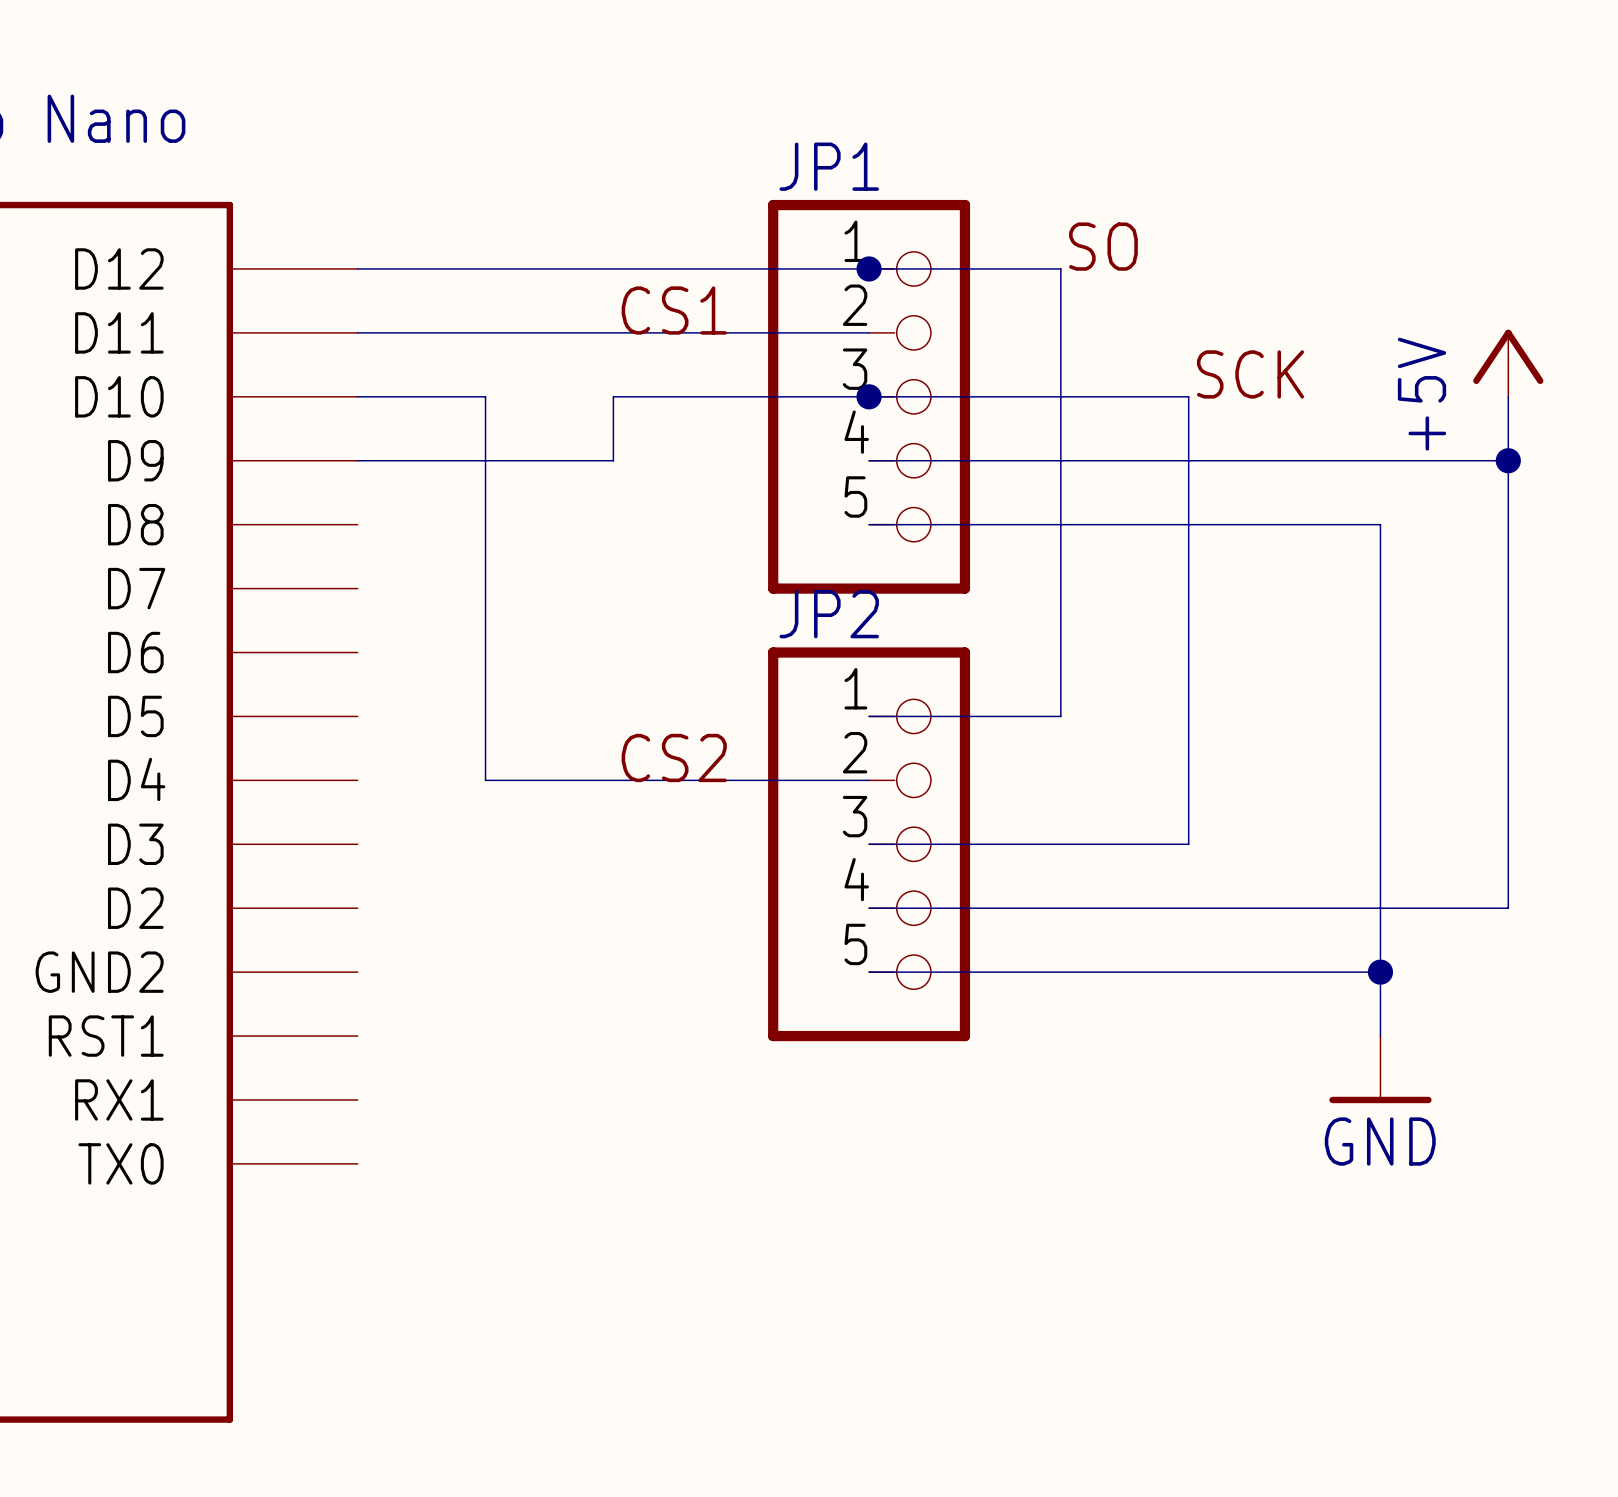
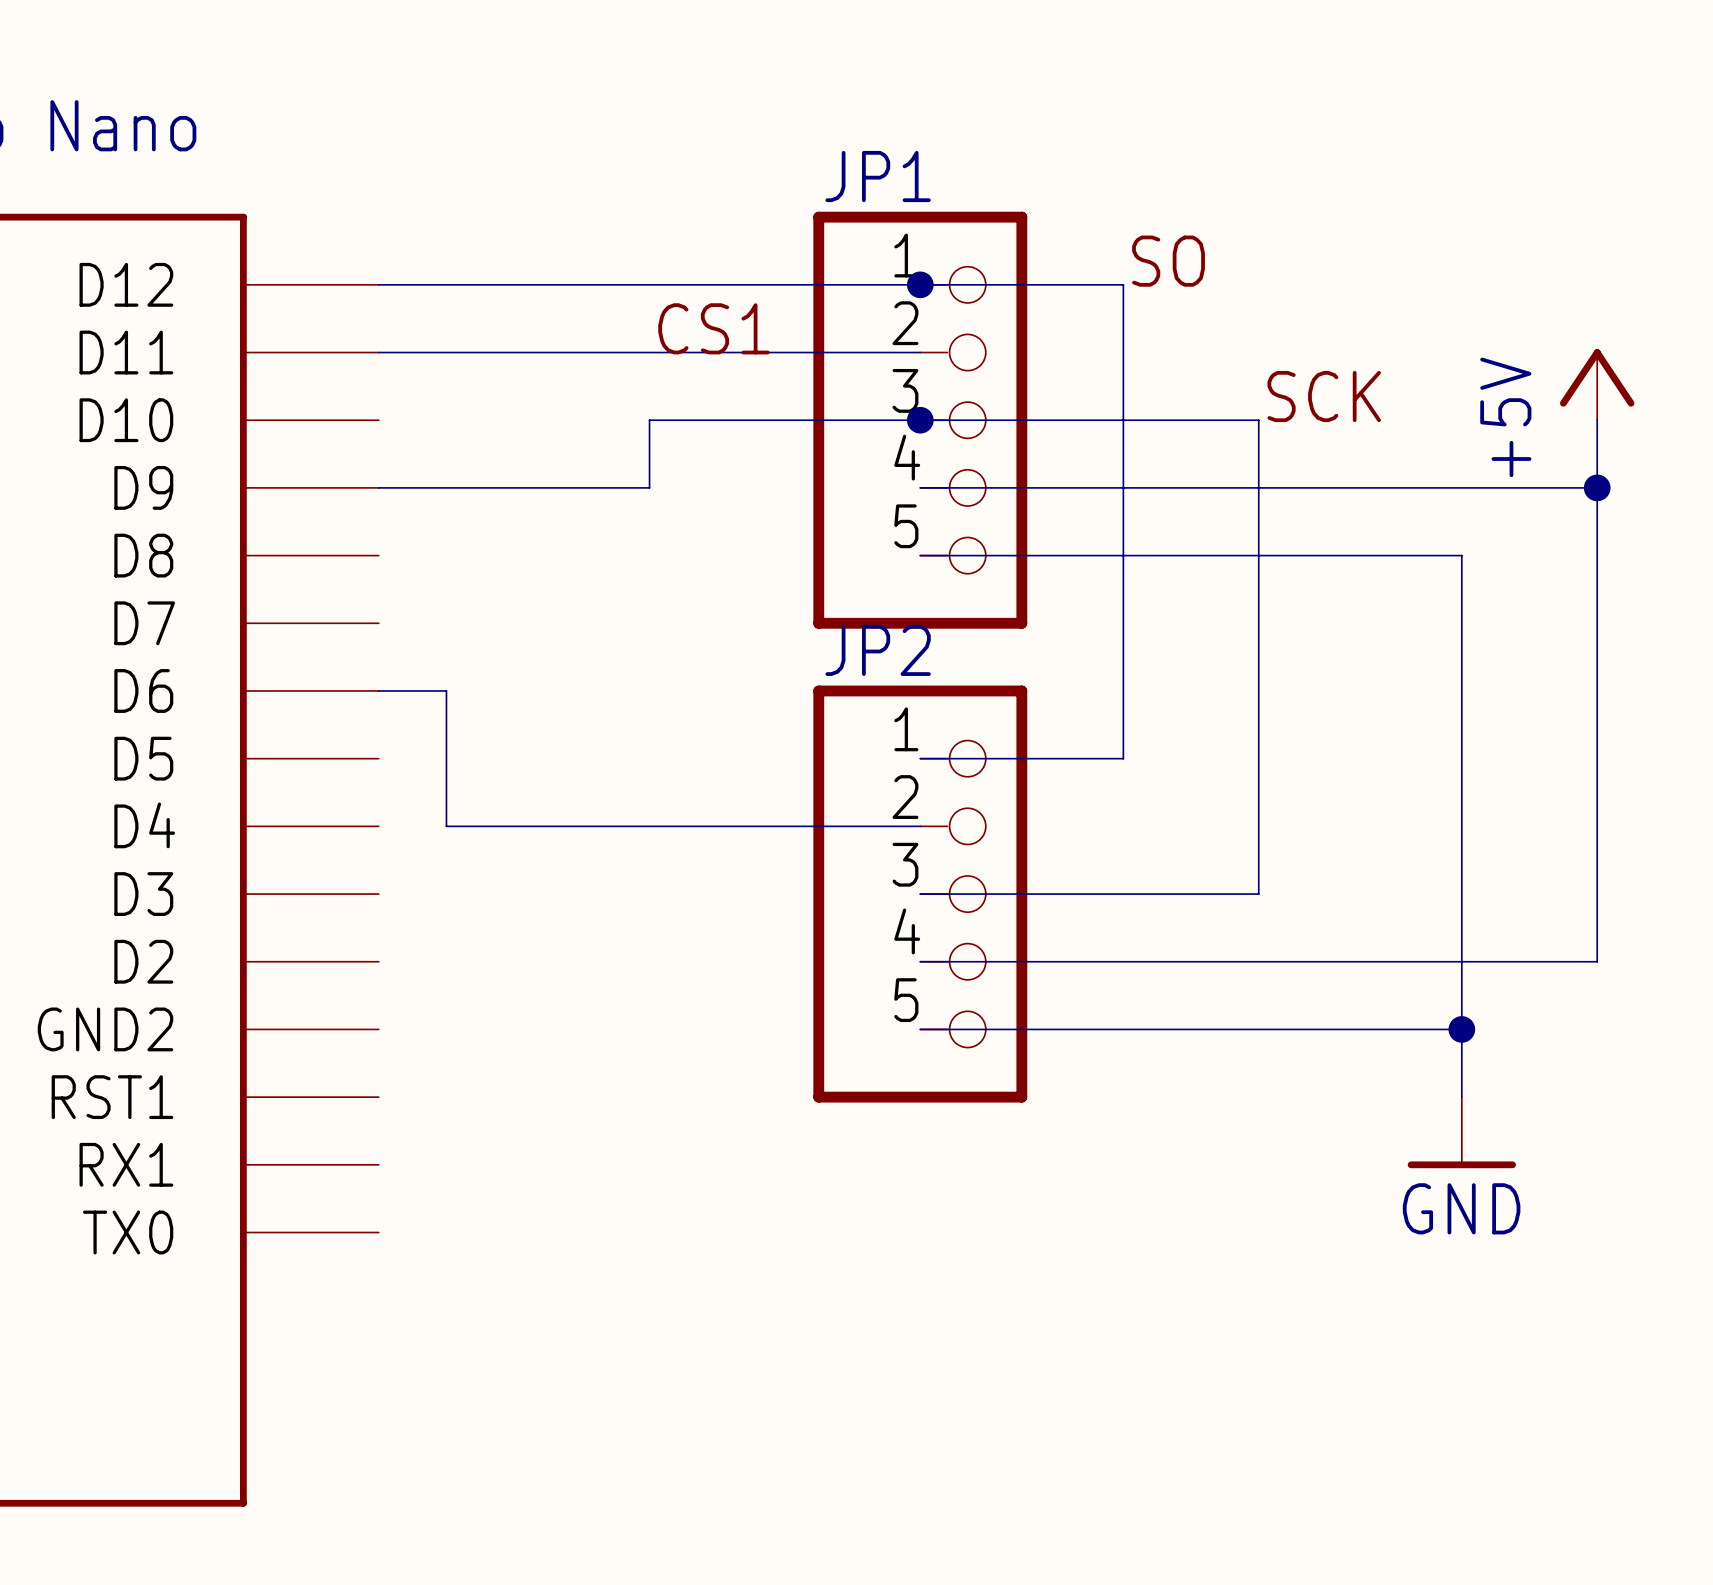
wire: (357, 396) (485, 396) (485, 780) -> (378, 690) (446, 690) (446, 826) (514, 826)
label: CS2 (674, 757) -> none

